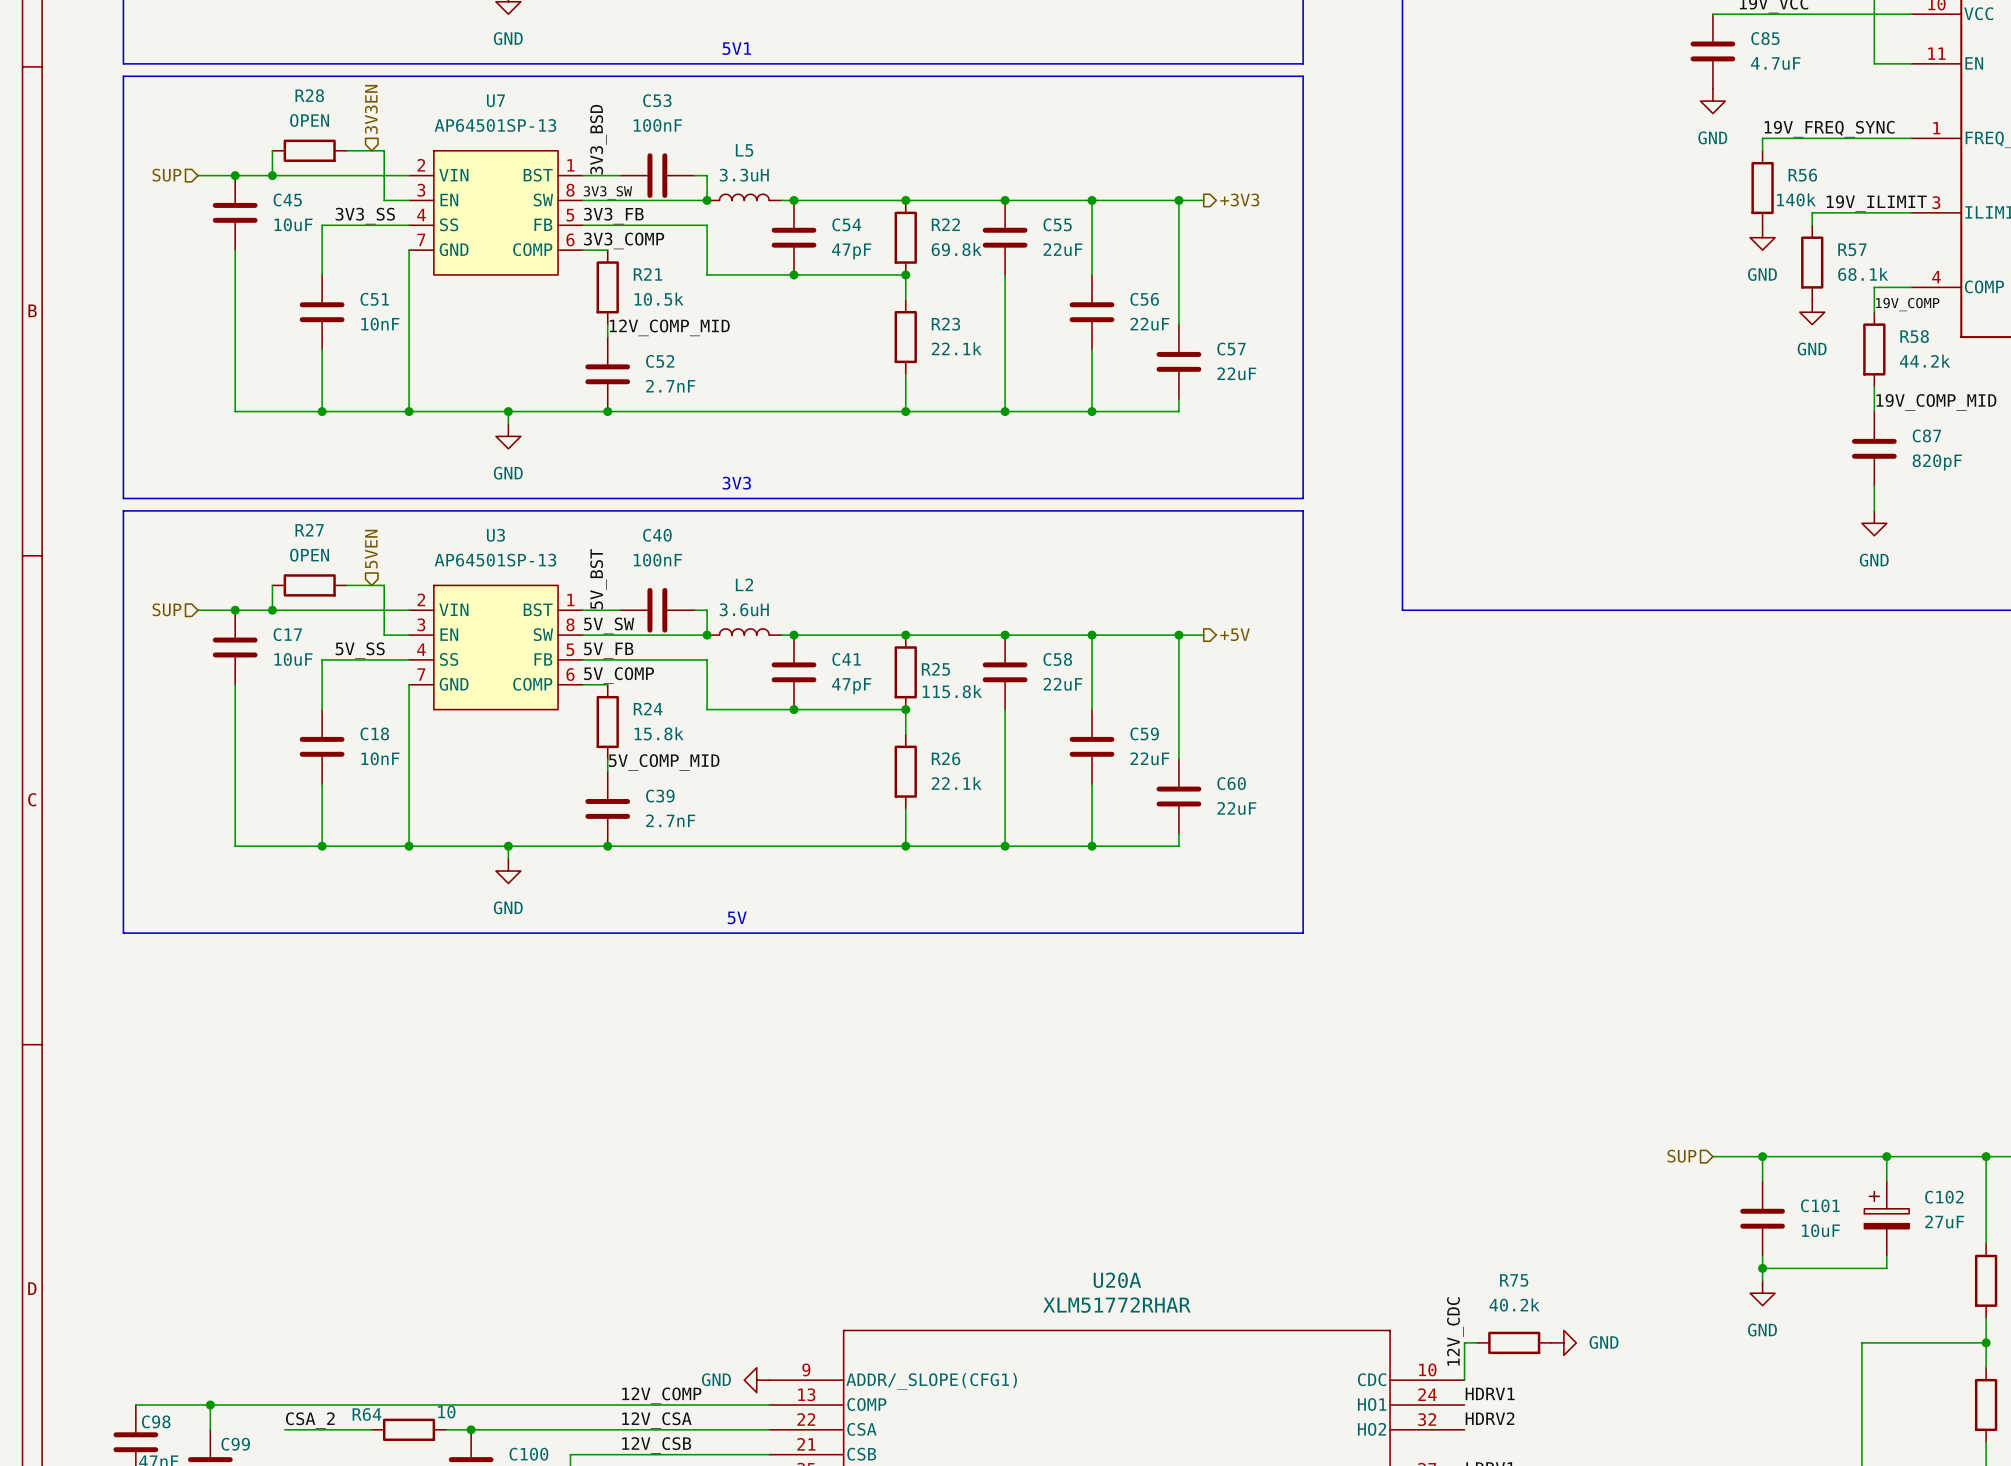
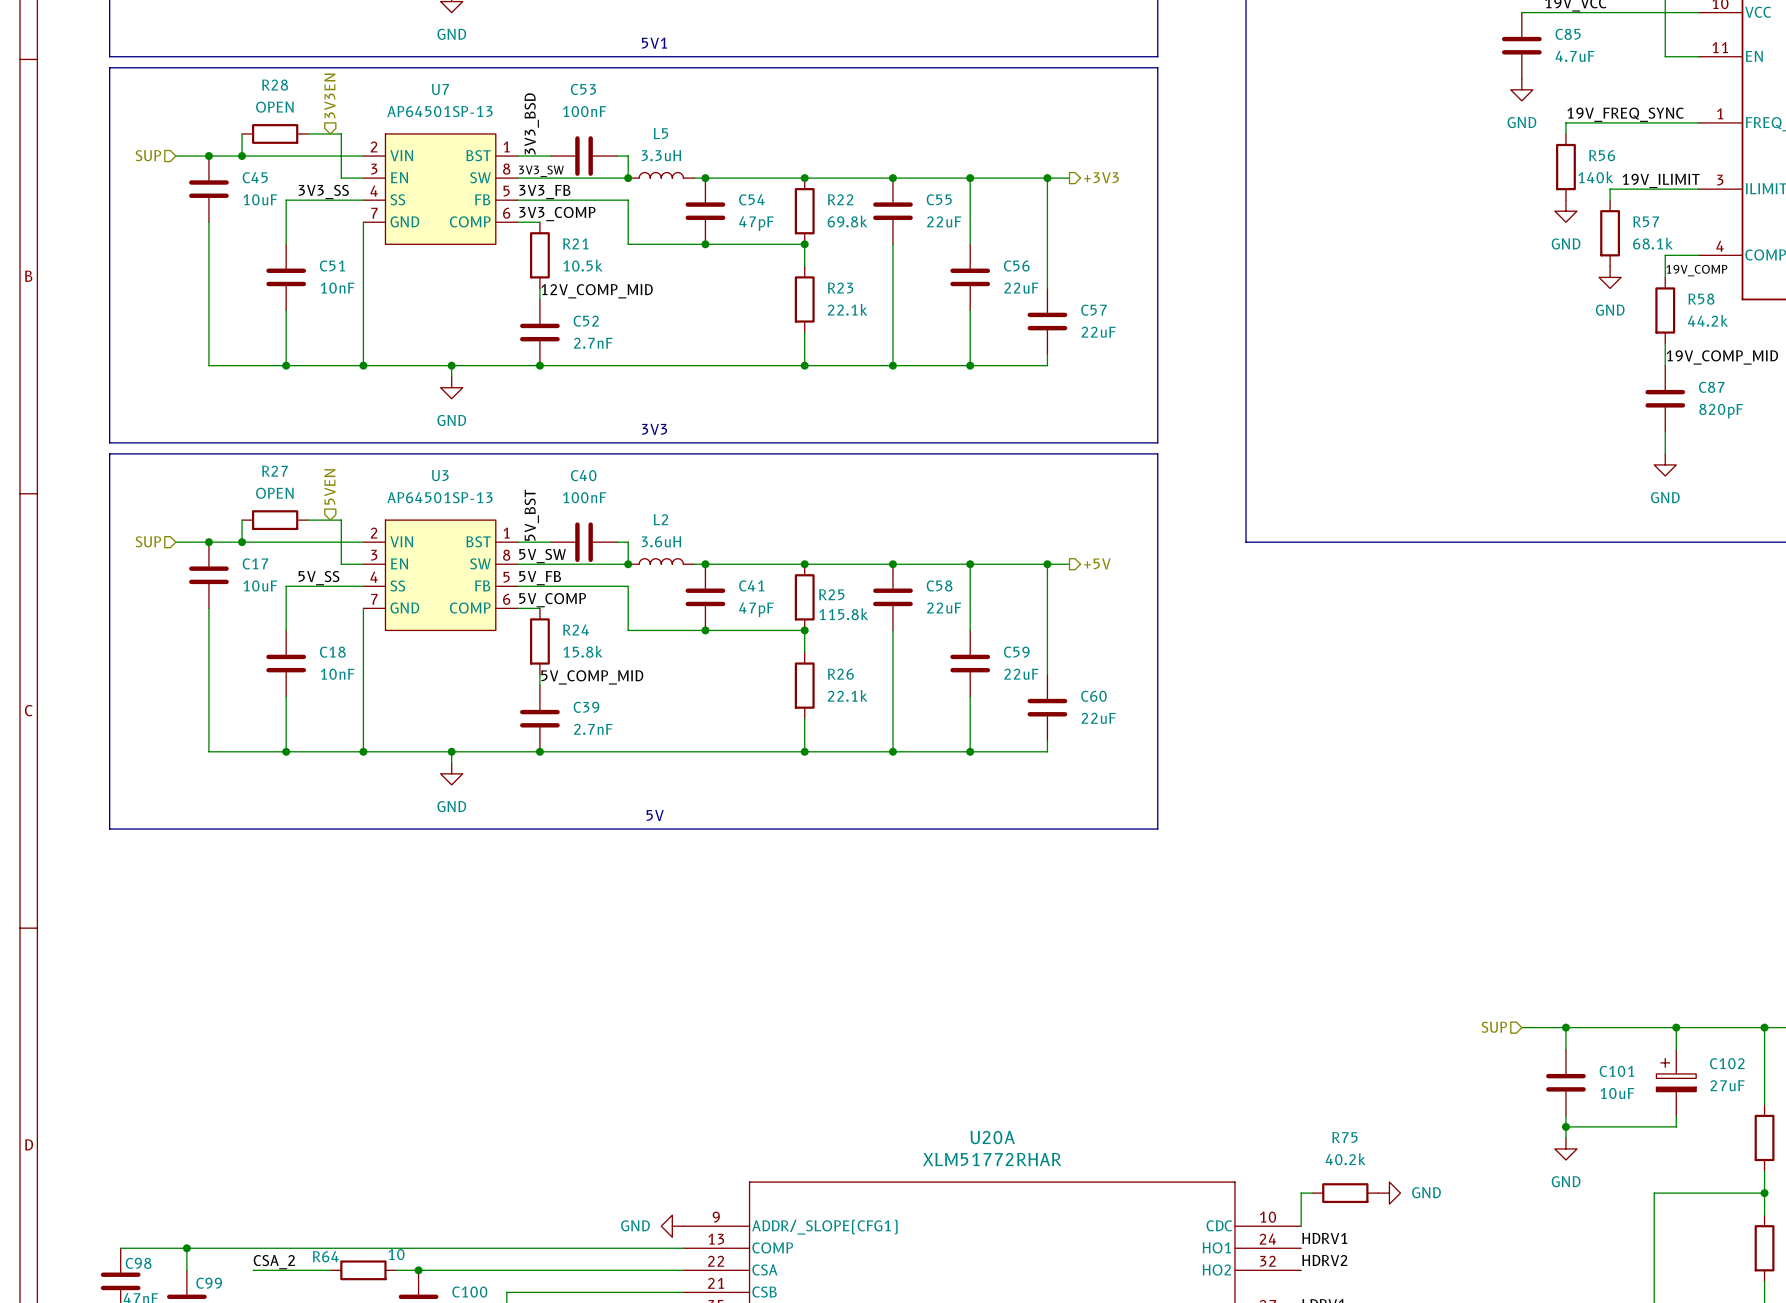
label: 12V_CDC (1455, 1331) -> none
label: 12V_COMP (661, 1395) -> none
label: 12V_CSA (656, 1420) -> none
label: 12V_CSB (656, 1445) -> none

